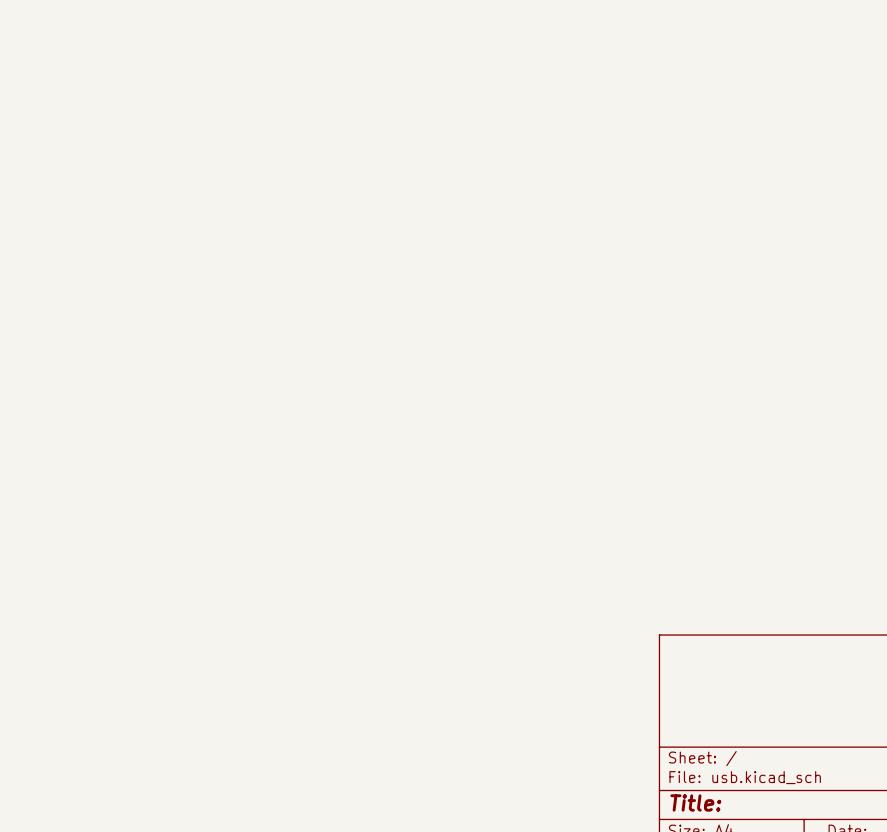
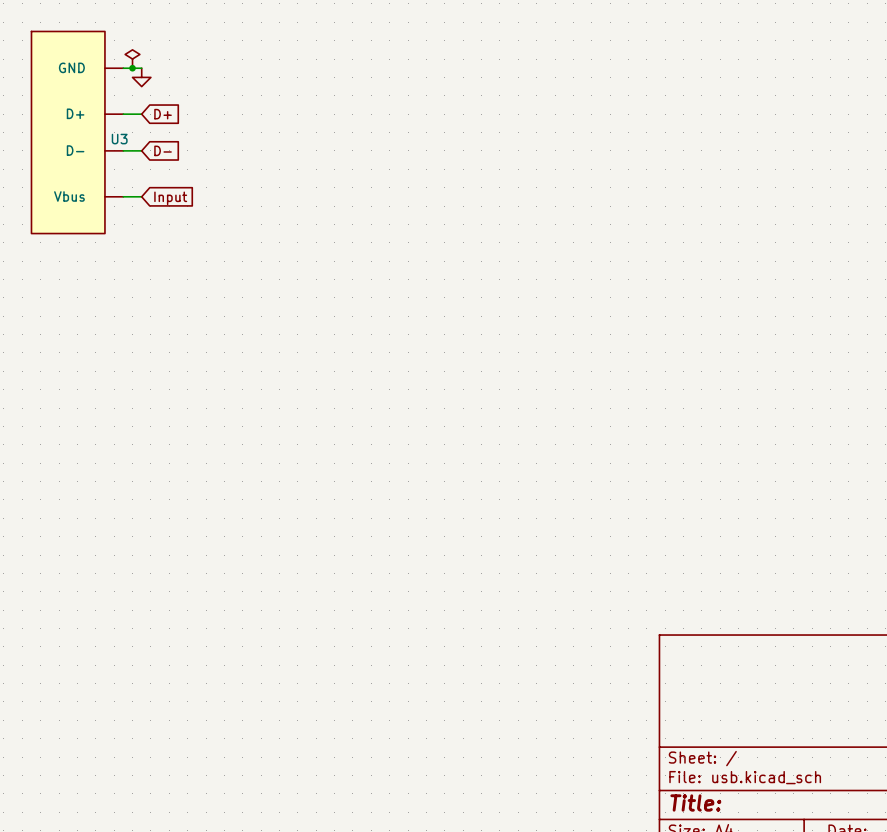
power symbol: none -> (132, 59)
wire: none -> (123, 68) (141, 68)
junction: none -> (132, 68)
power symbol: none -> (141, 77)
wire: none -> (123, 114) (141, 114)
global label: none -> D+ (163, 114)
U3: none -> (77, 132)
wire: none -> (123, 150) (141, 150)
global label: none -> D- (163, 150)
wire: none -> (123, 196) (141, 196)
global label: none -> Input (170, 198)

